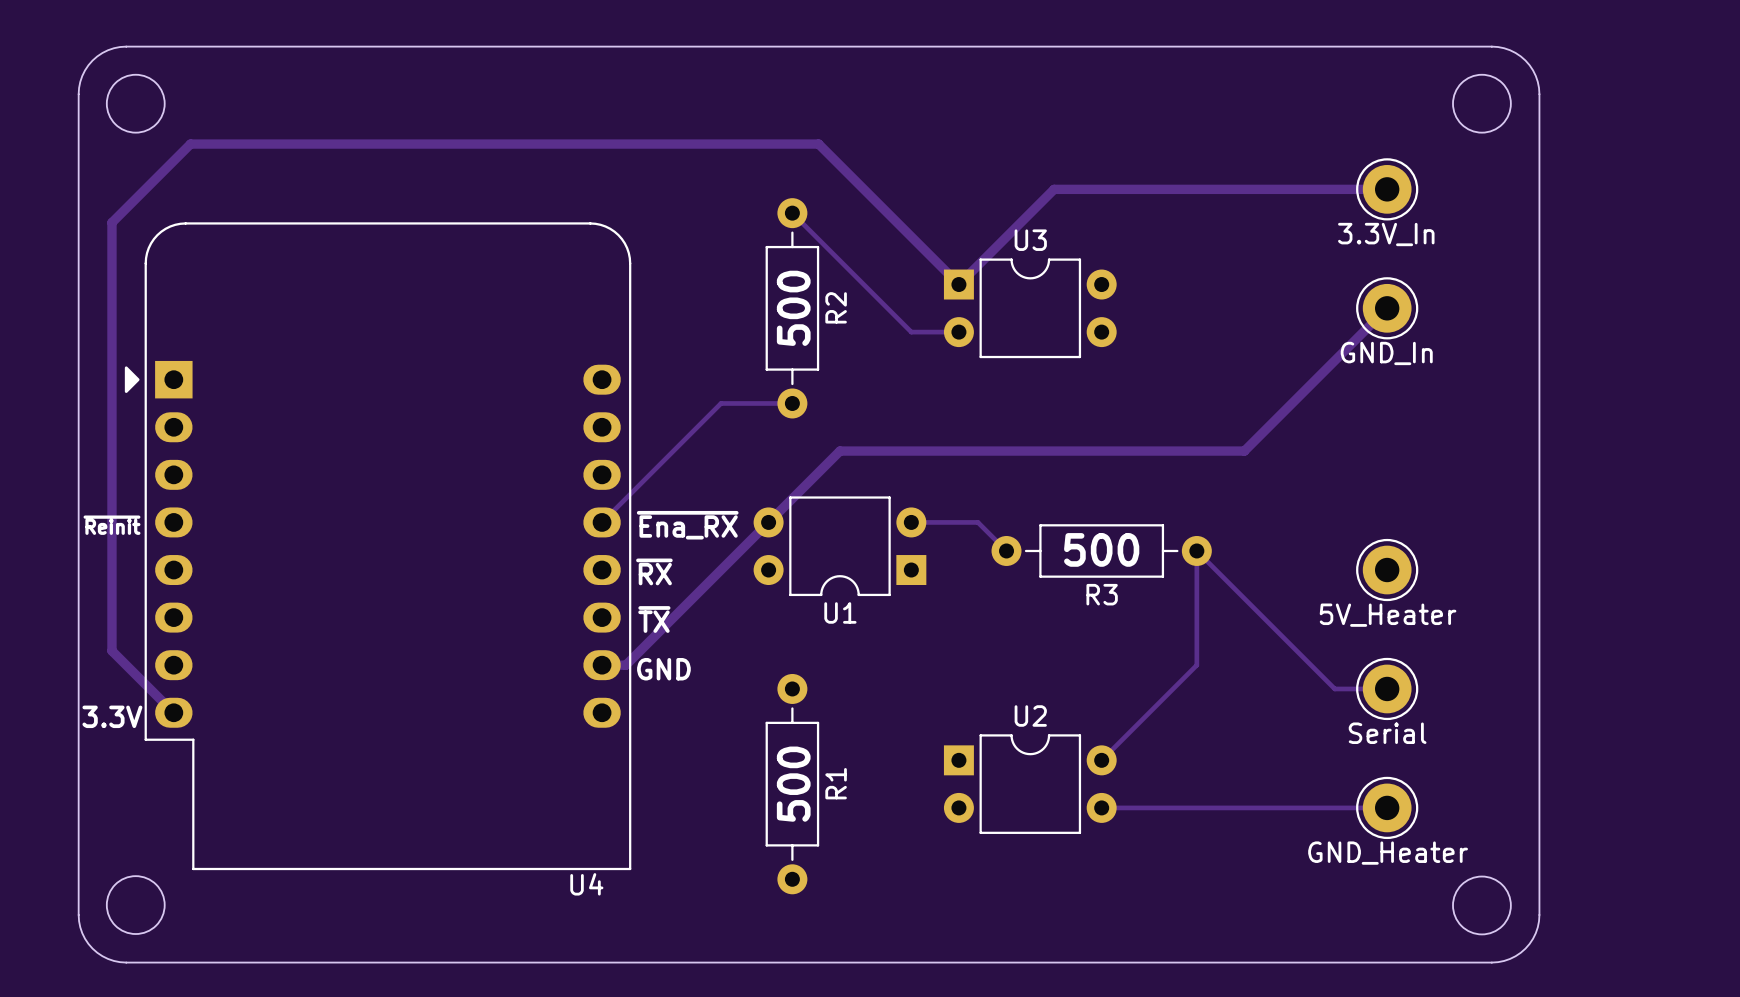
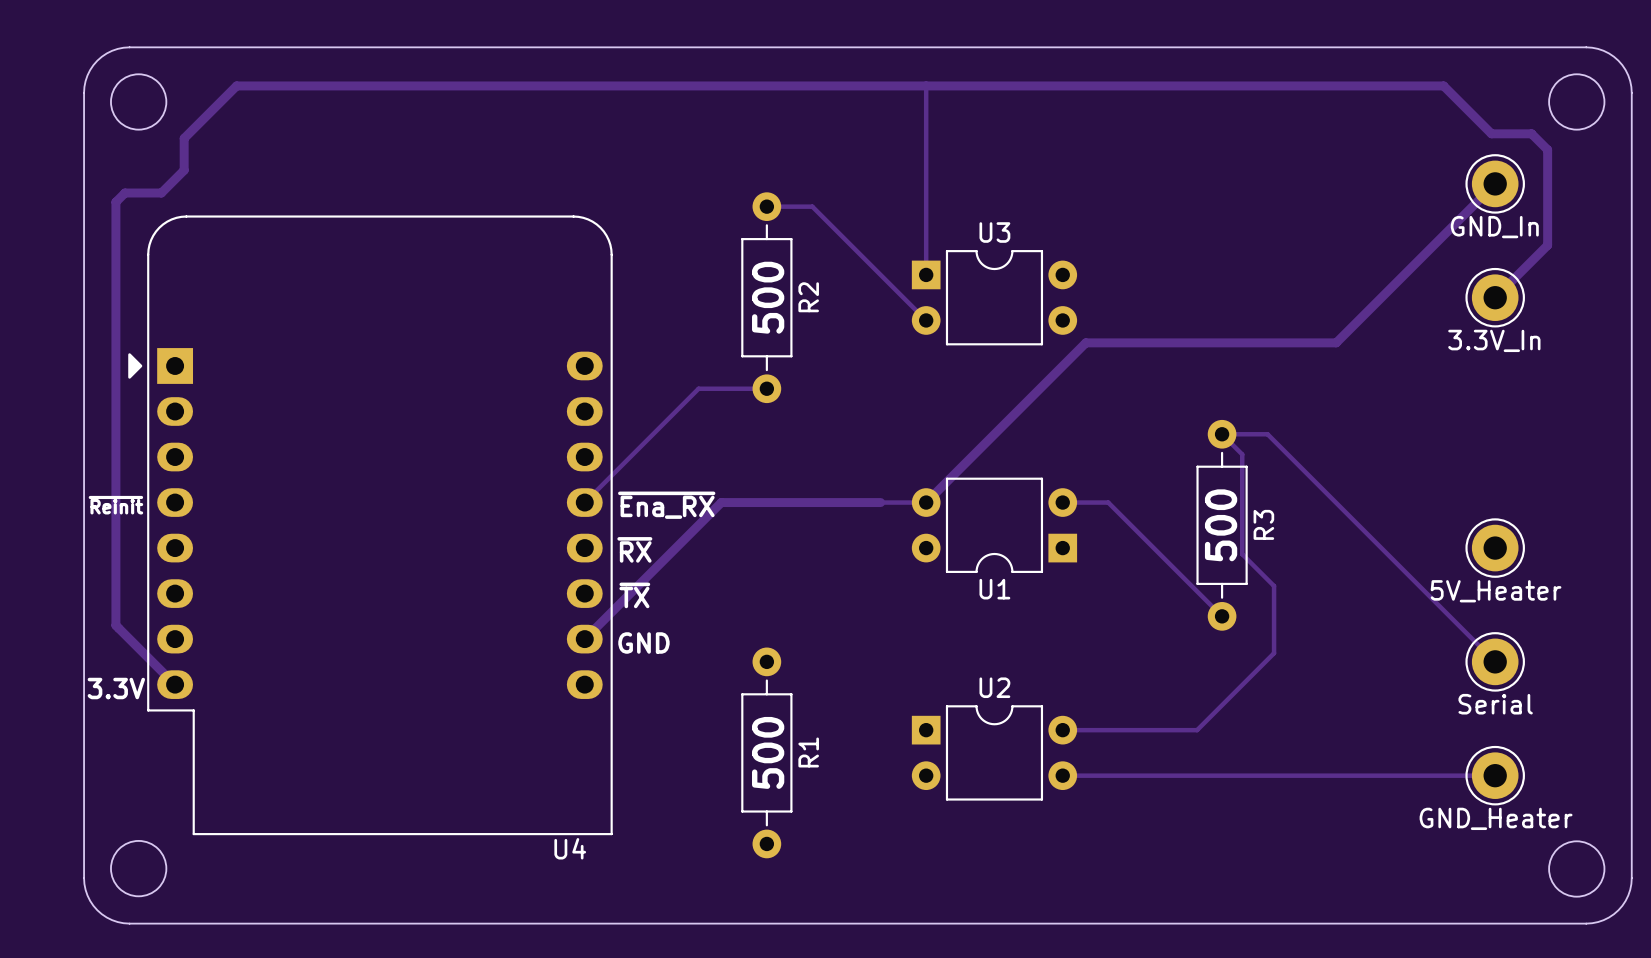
board edge: (1491, 46) (1510, 50) (1525, 60) (1535, 75) (1539, 94) (1539, 914) (1535, 933) (1525, 948) (1510, 958) (1491, 962) -> (1436, 47) (1598, 48) (1613, 56) (1622, 65) (1630, 81) (1631, 92) (1631, 878) (1630, 889) (1625, 900) (1618, 910) (1603, 920) (1592, 923) (1436, 923)
round board edge position: (1481, 103) -> (1576, 101)
track: (1387, 189) (1054, 189) (958, 284) -> (926, 86) (926, 274)
3.3V_In position: (1387, 189) -> (1495, 297)
track: (792, 213) (911, 332) (958, 332) -> (766, 206) (812, 206) (926, 320)
track: (111, 222) (190, 144) (818, 144) (958, 284) -> (115, 215) (115, 202) (125, 193) (161, 193) (184, 170) (184, 138) (236, 85) (1443, 85) (1491, 133) (1531, 133) (1547, 149) (1547, 245) (1495, 297) (1492, 295)
track: (1387, 308) (1244, 451) (839, 451) (625, 665) (602, 665) -> (880, 502) (721, 502) (584, 639)
GND_In position: (1387, 308) -> (1495, 183)
track: (958, 522) (977, 522) (1006, 550) -> (926, 502) (1085, 342) (1336, 342) (1495, 183)
track: none -> (1062, 502) (1108, 502) (1222, 616)
U1 position: (839, 546) -> (994, 525)
text rotation: 0° (1101, 549) -> 90° counterclockwise (1221, 525)
text position: 500 (1101, 549) -> 500 (1221, 525)
R3 rotation: 0° (1101, 550) -> 90° clockwise (1222, 525)
R3 position: (1101, 550) -> (1222, 525)
5V_Heater position: (1387, 570) -> (1495, 548)
R3 name position: R3 (1102, 594) -> R3 (1263, 524)
track: (1387, 688) (1334, 688) (1196, 550) (1196, 665) (1101, 760) -> (1495, 661) (1267, 434) (1222, 434) (1242, 454) (1242, 554) (1274, 586) (1274, 653) (1197, 730) (1062, 730)
Serial position: (1387, 688) -> (1495, 661)
track: none -> (1335, 775) (1495, 775)
GND_Heater position: (1387, 807) -> (1495, 775)
round board edge position: (1481, 905) -> (1576, 868)

